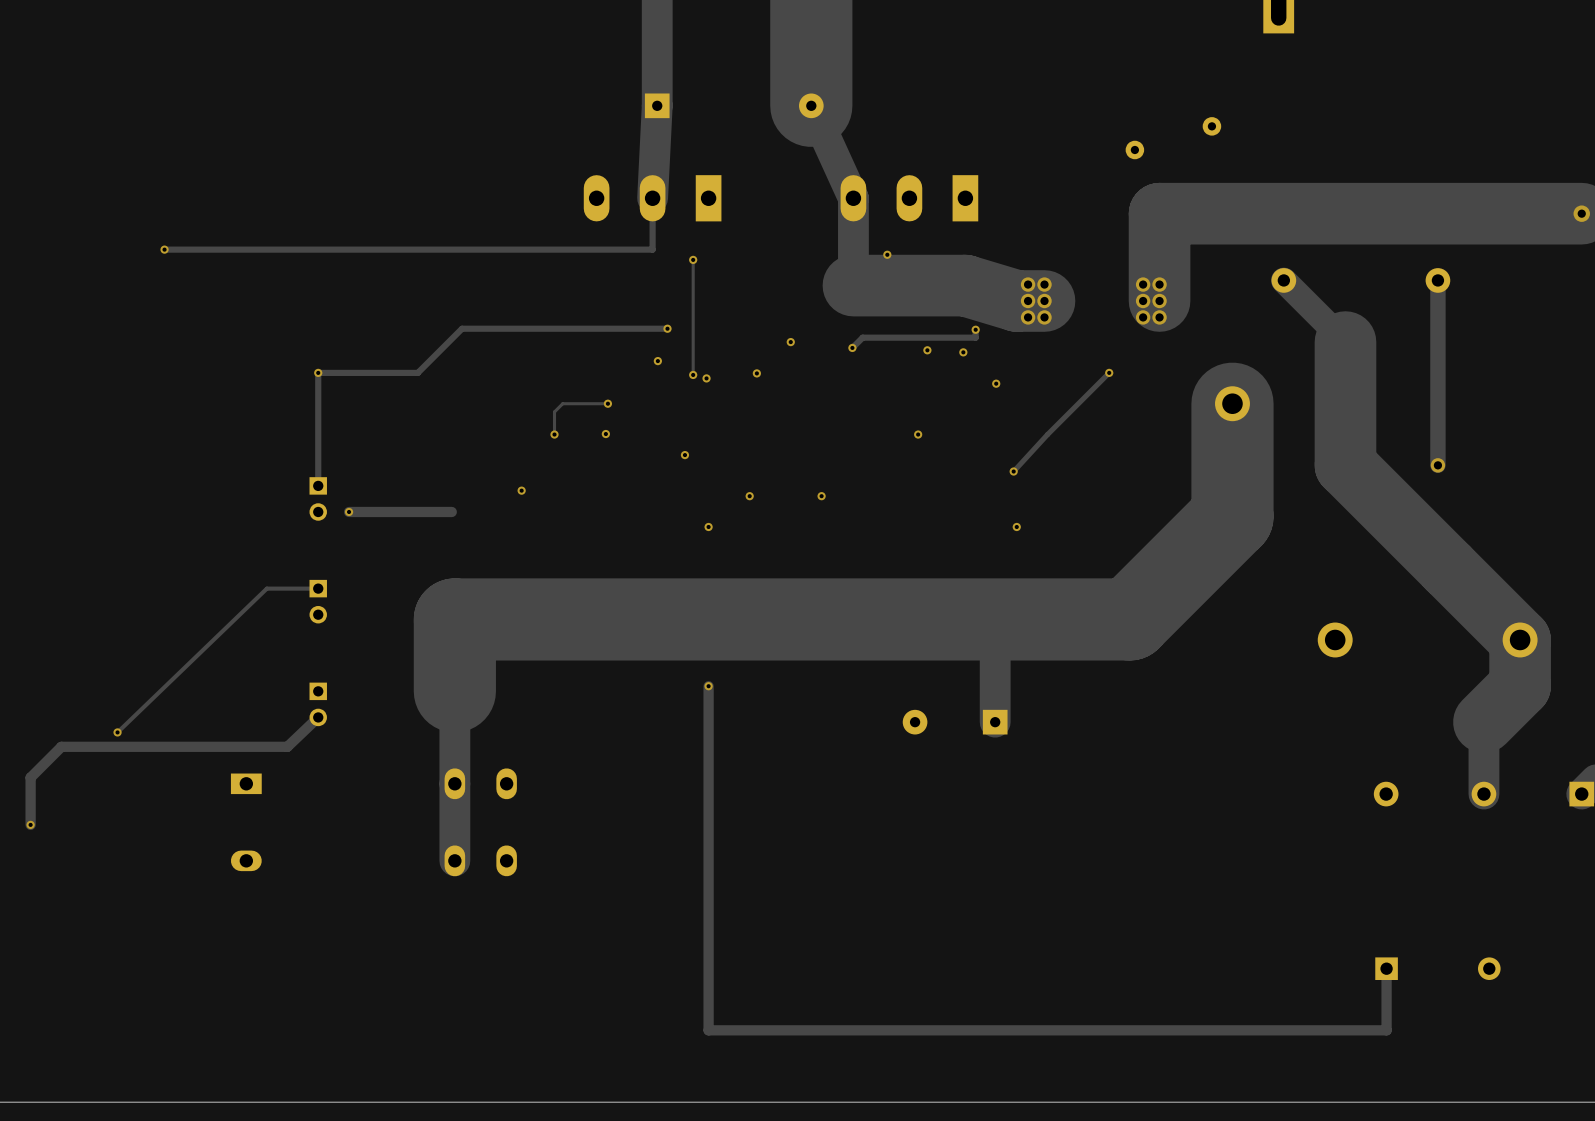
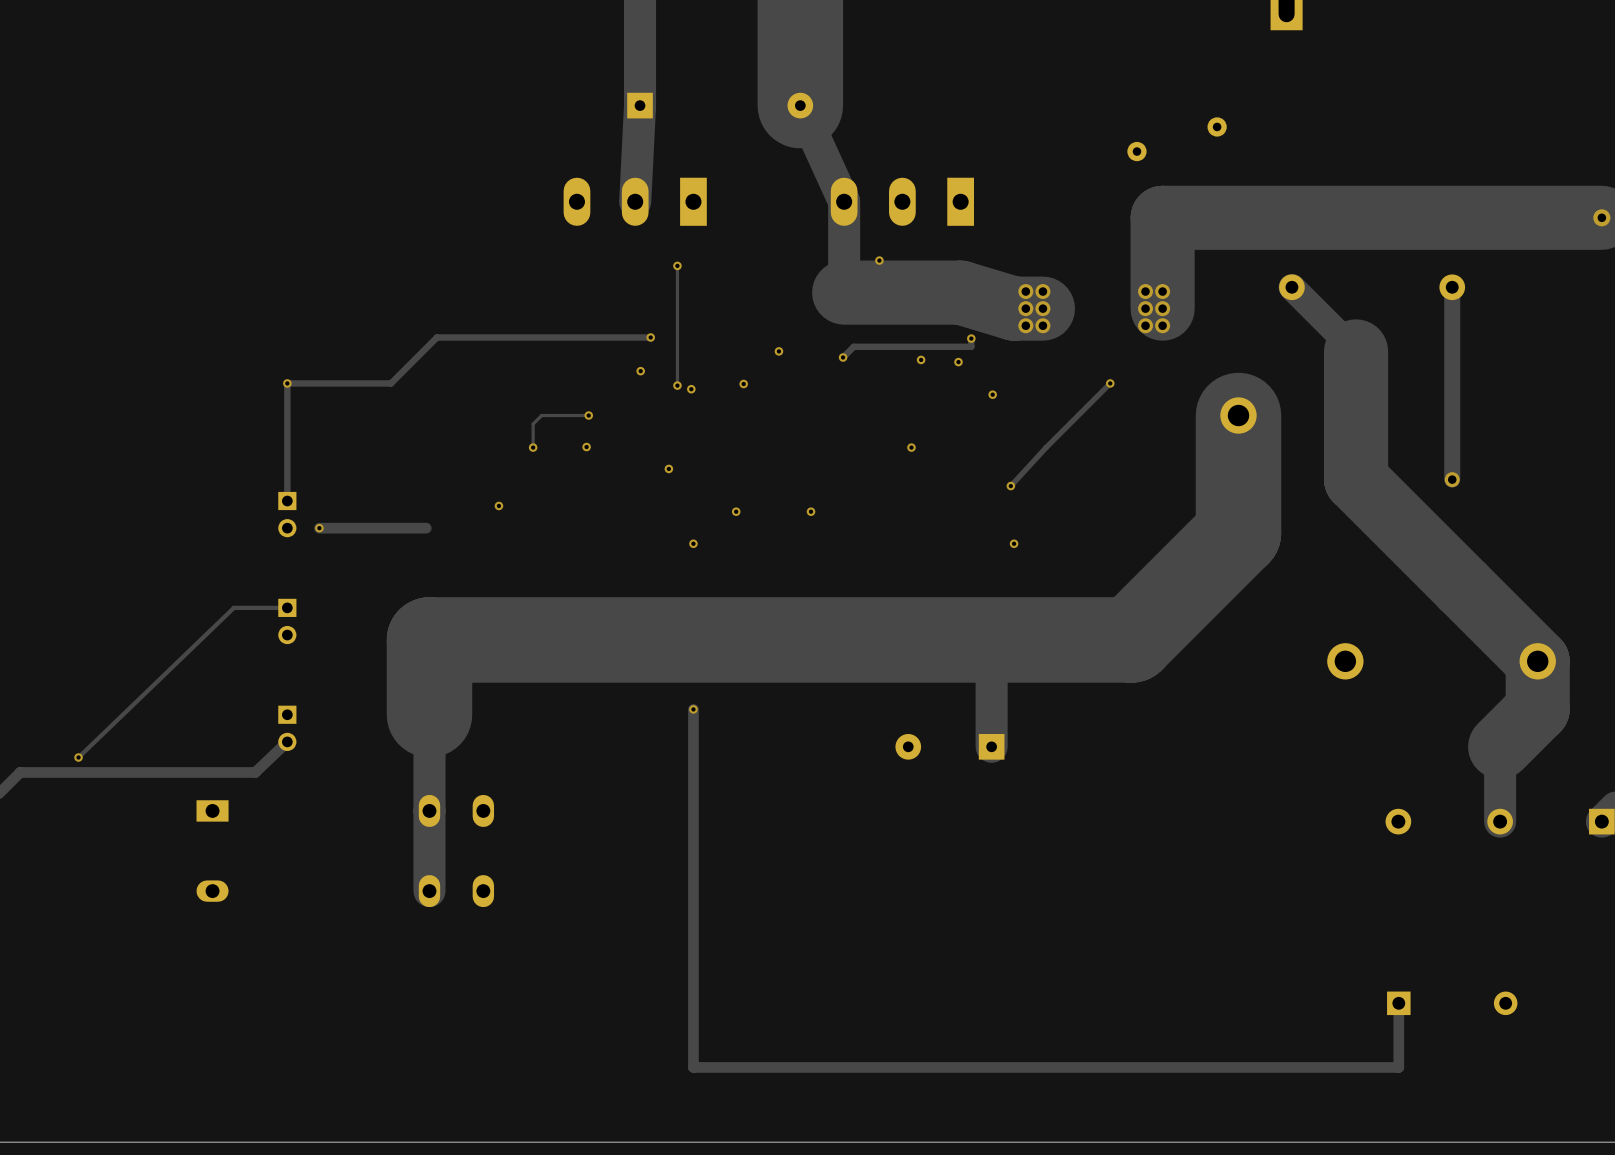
track: (652, 198) (652, 249) (164, 249) -> none
via: (164, 249) -> none

